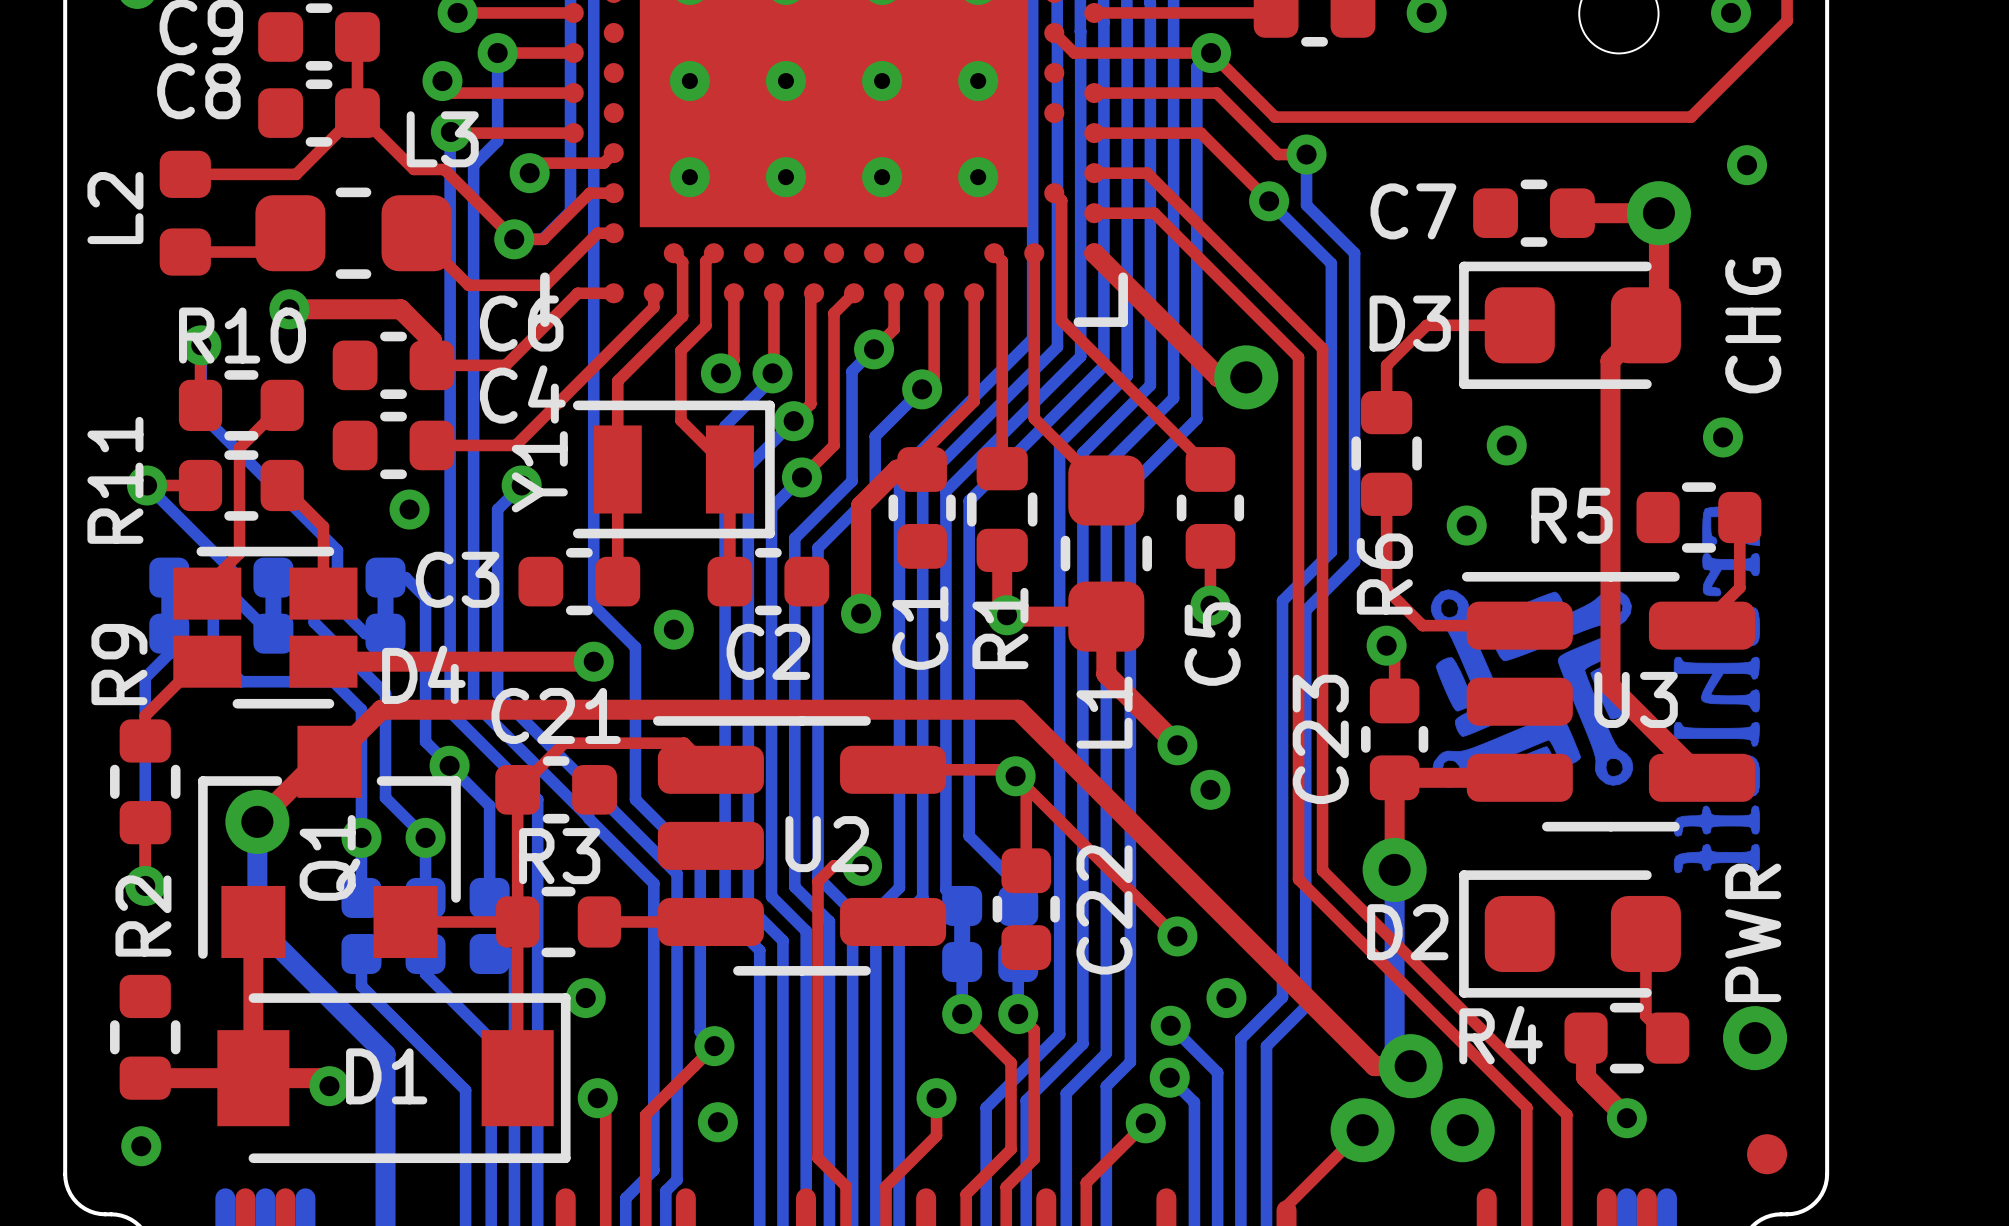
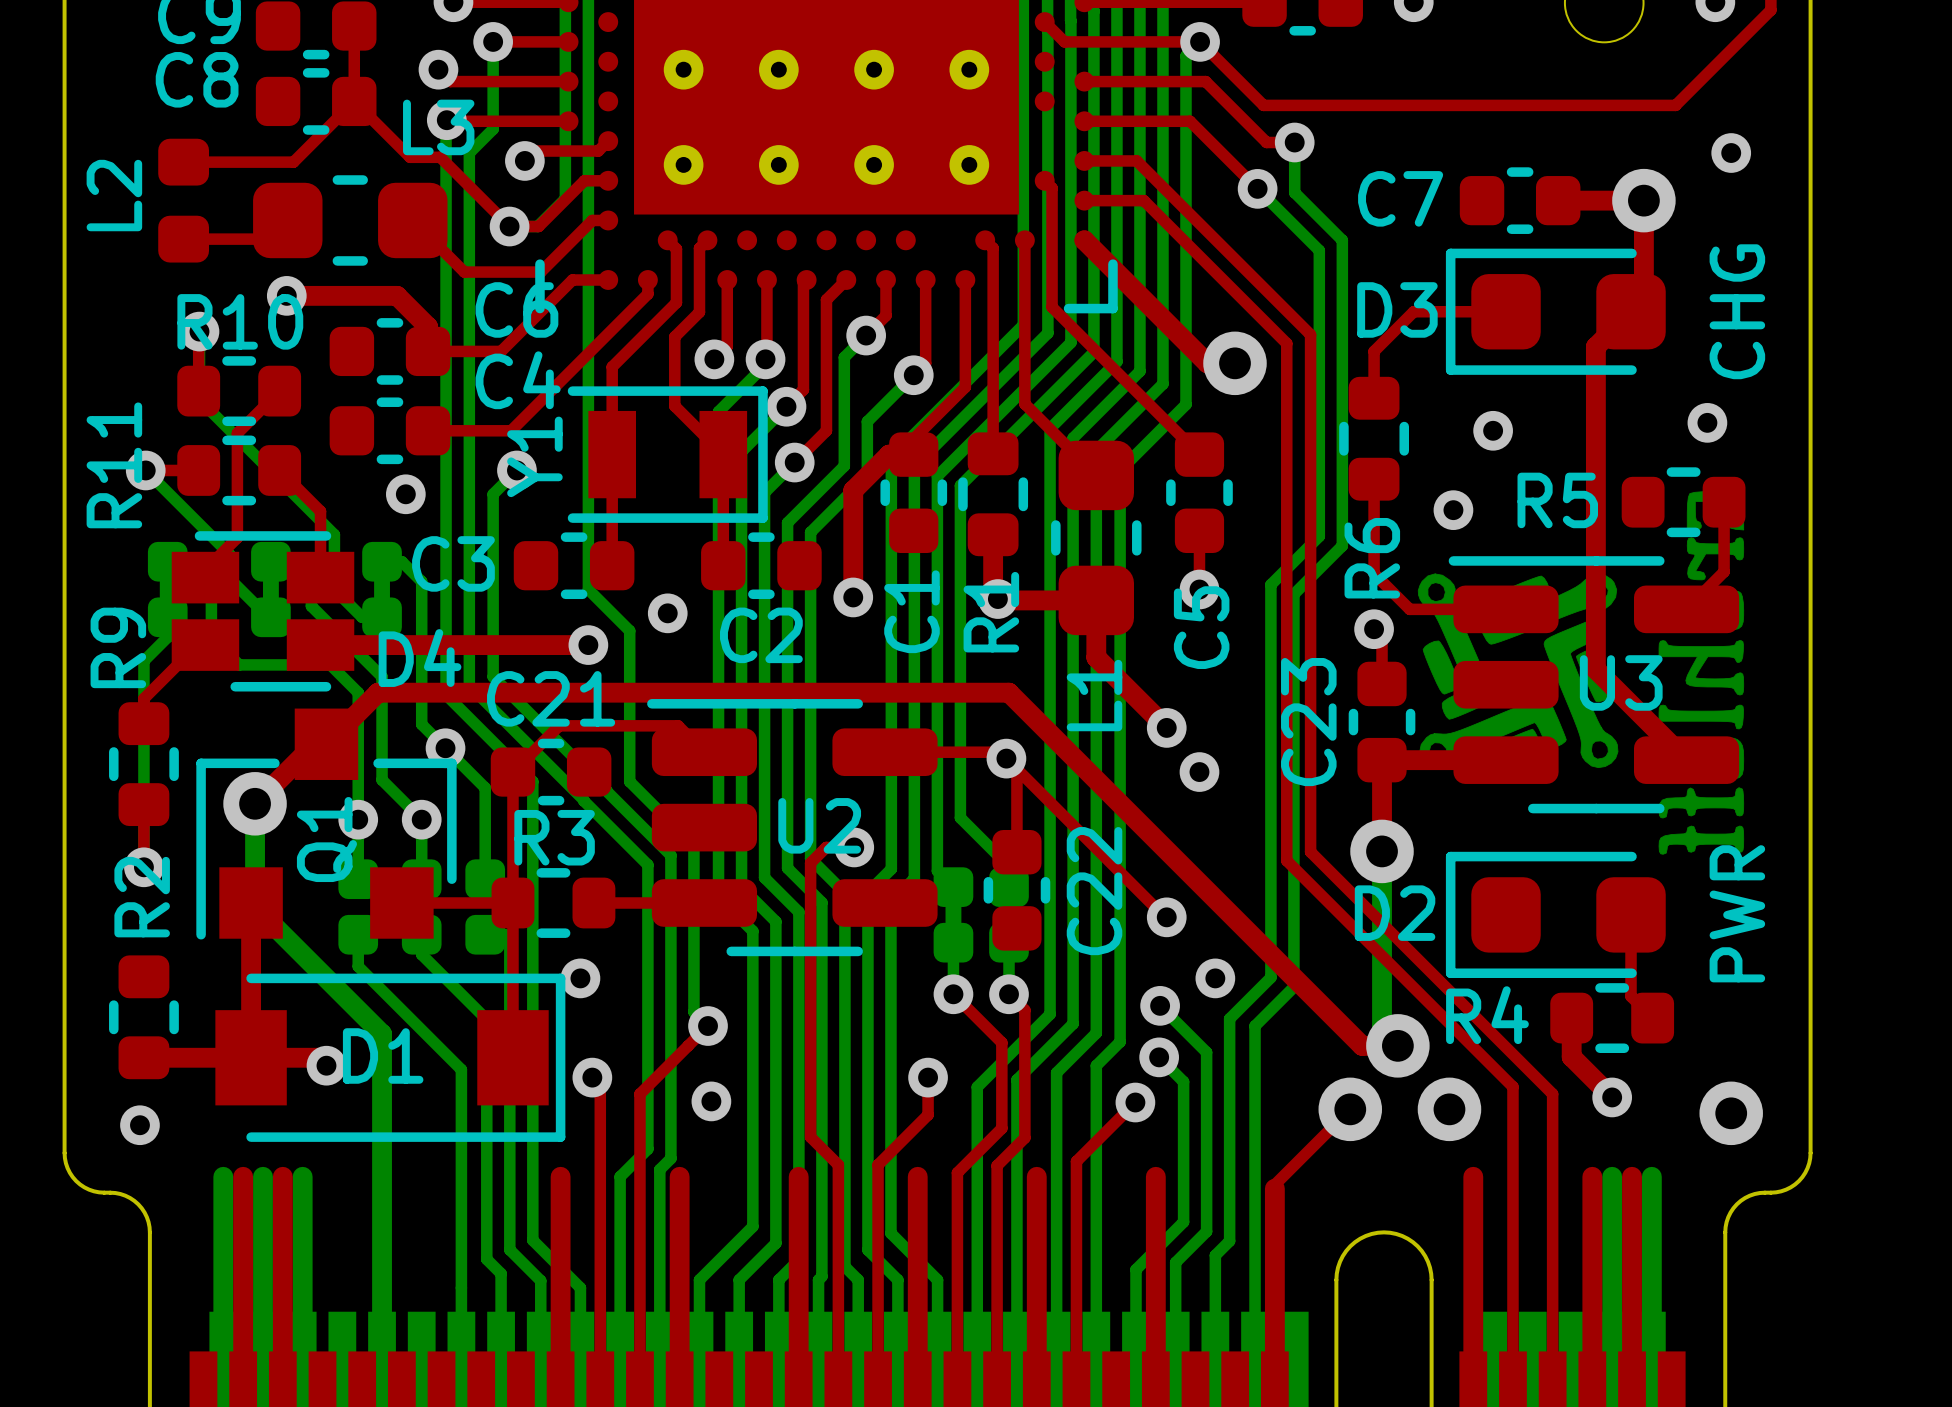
via position: (1755, 1038) -> (1731, 1113)
part: (1767, 1154) -> none

